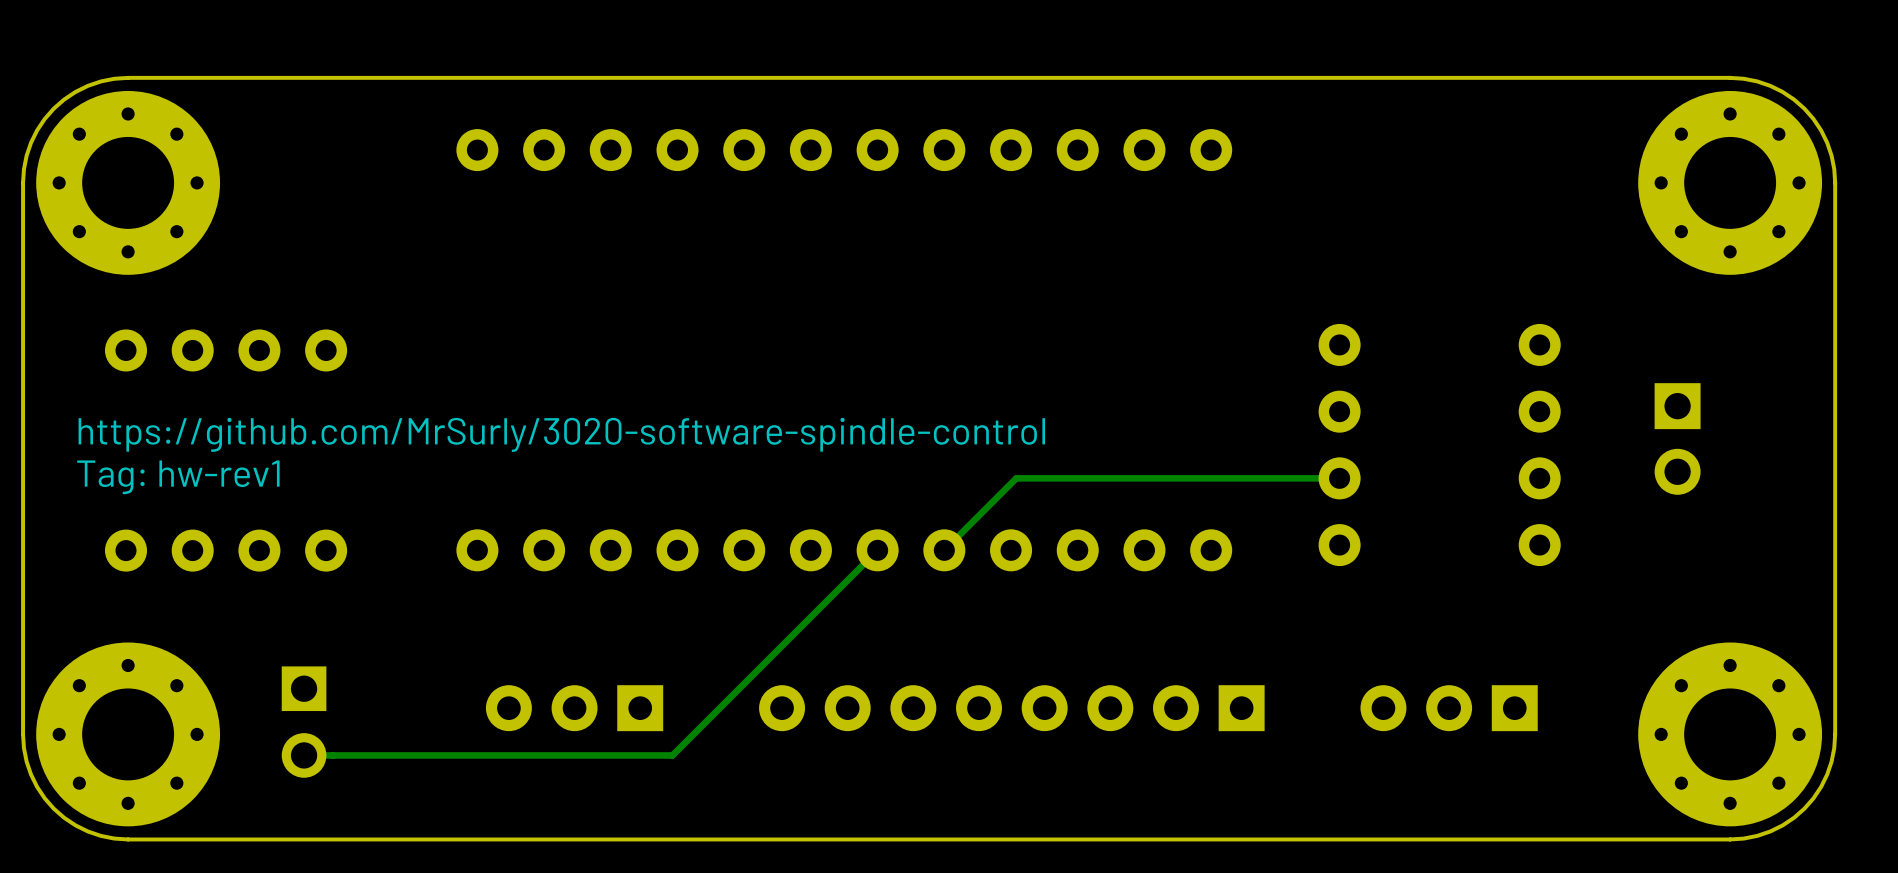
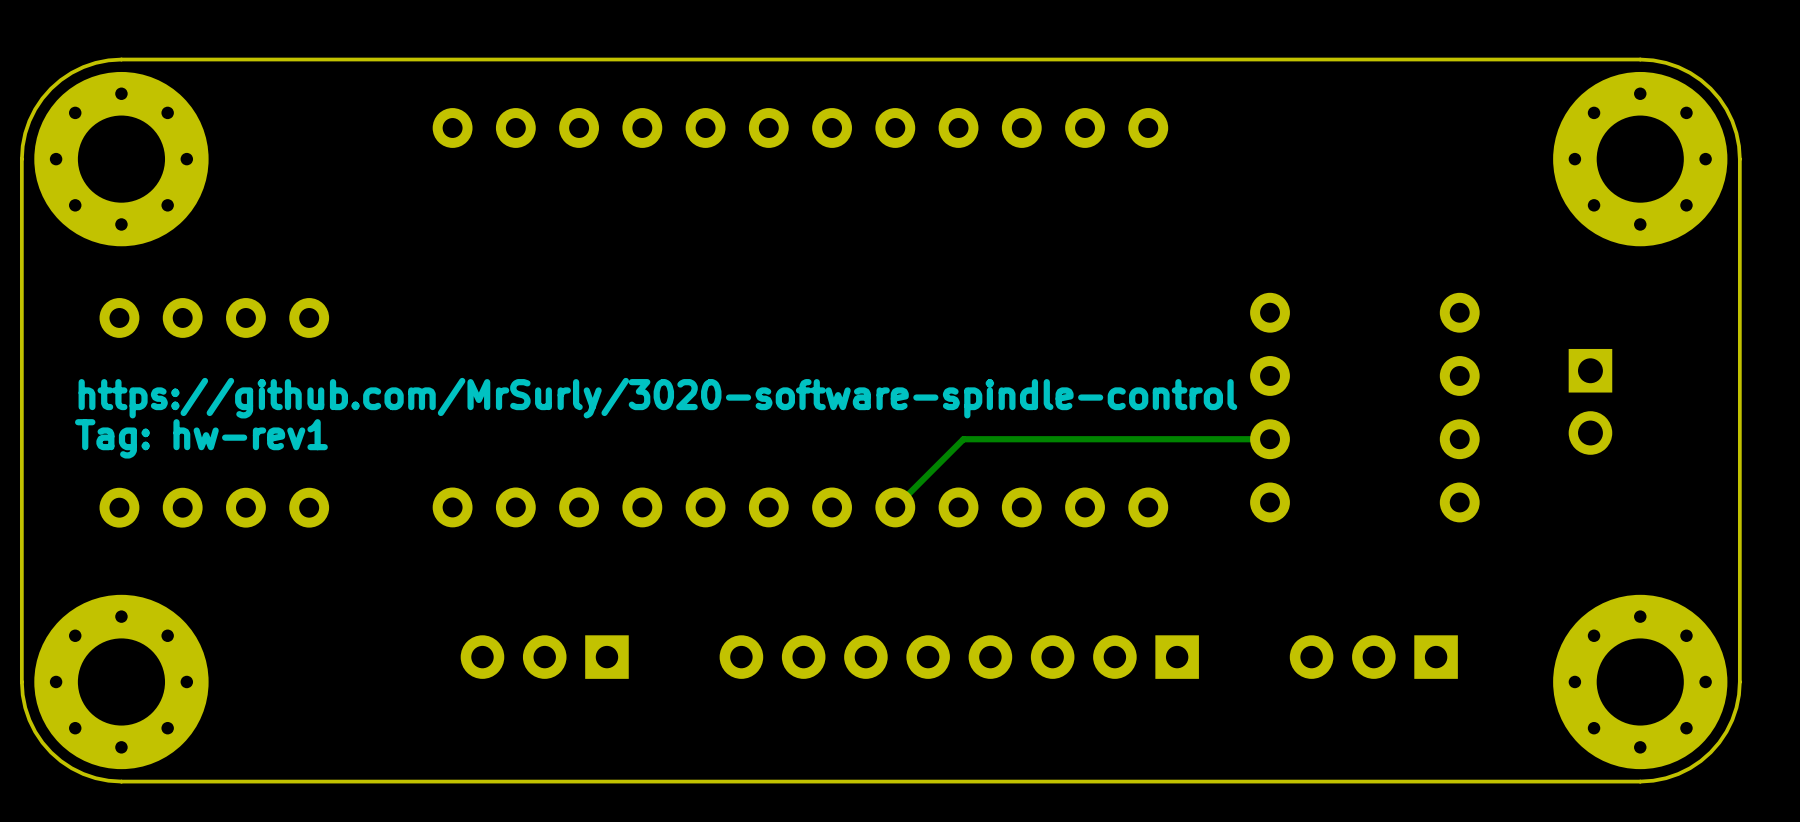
track: (877, 550) (672, 755) -> none
part: (304, 722) -> none
track: (671, 755) (304, 755) -> none

